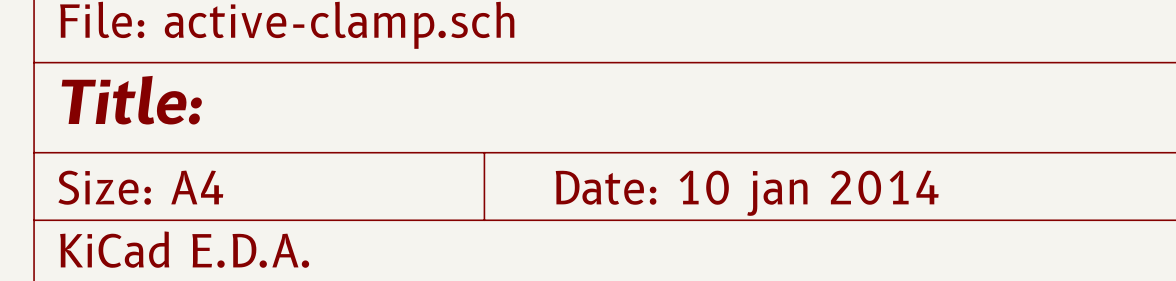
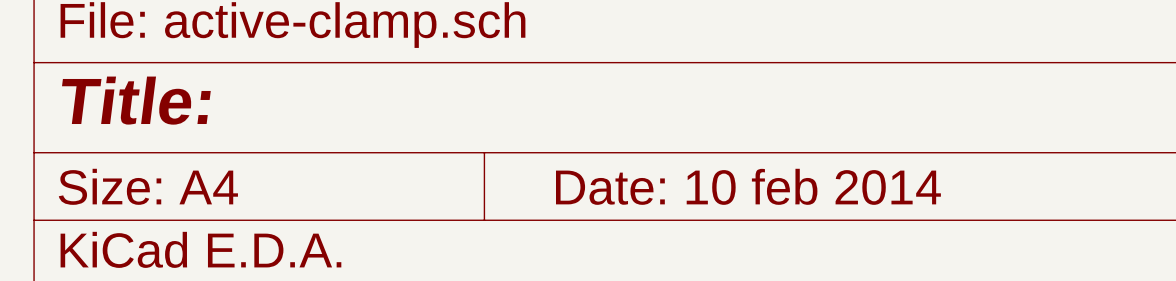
title block: Date: 10 jan 2014 (747, 193) -> Date: 10 feb 2014 (748, 186)

